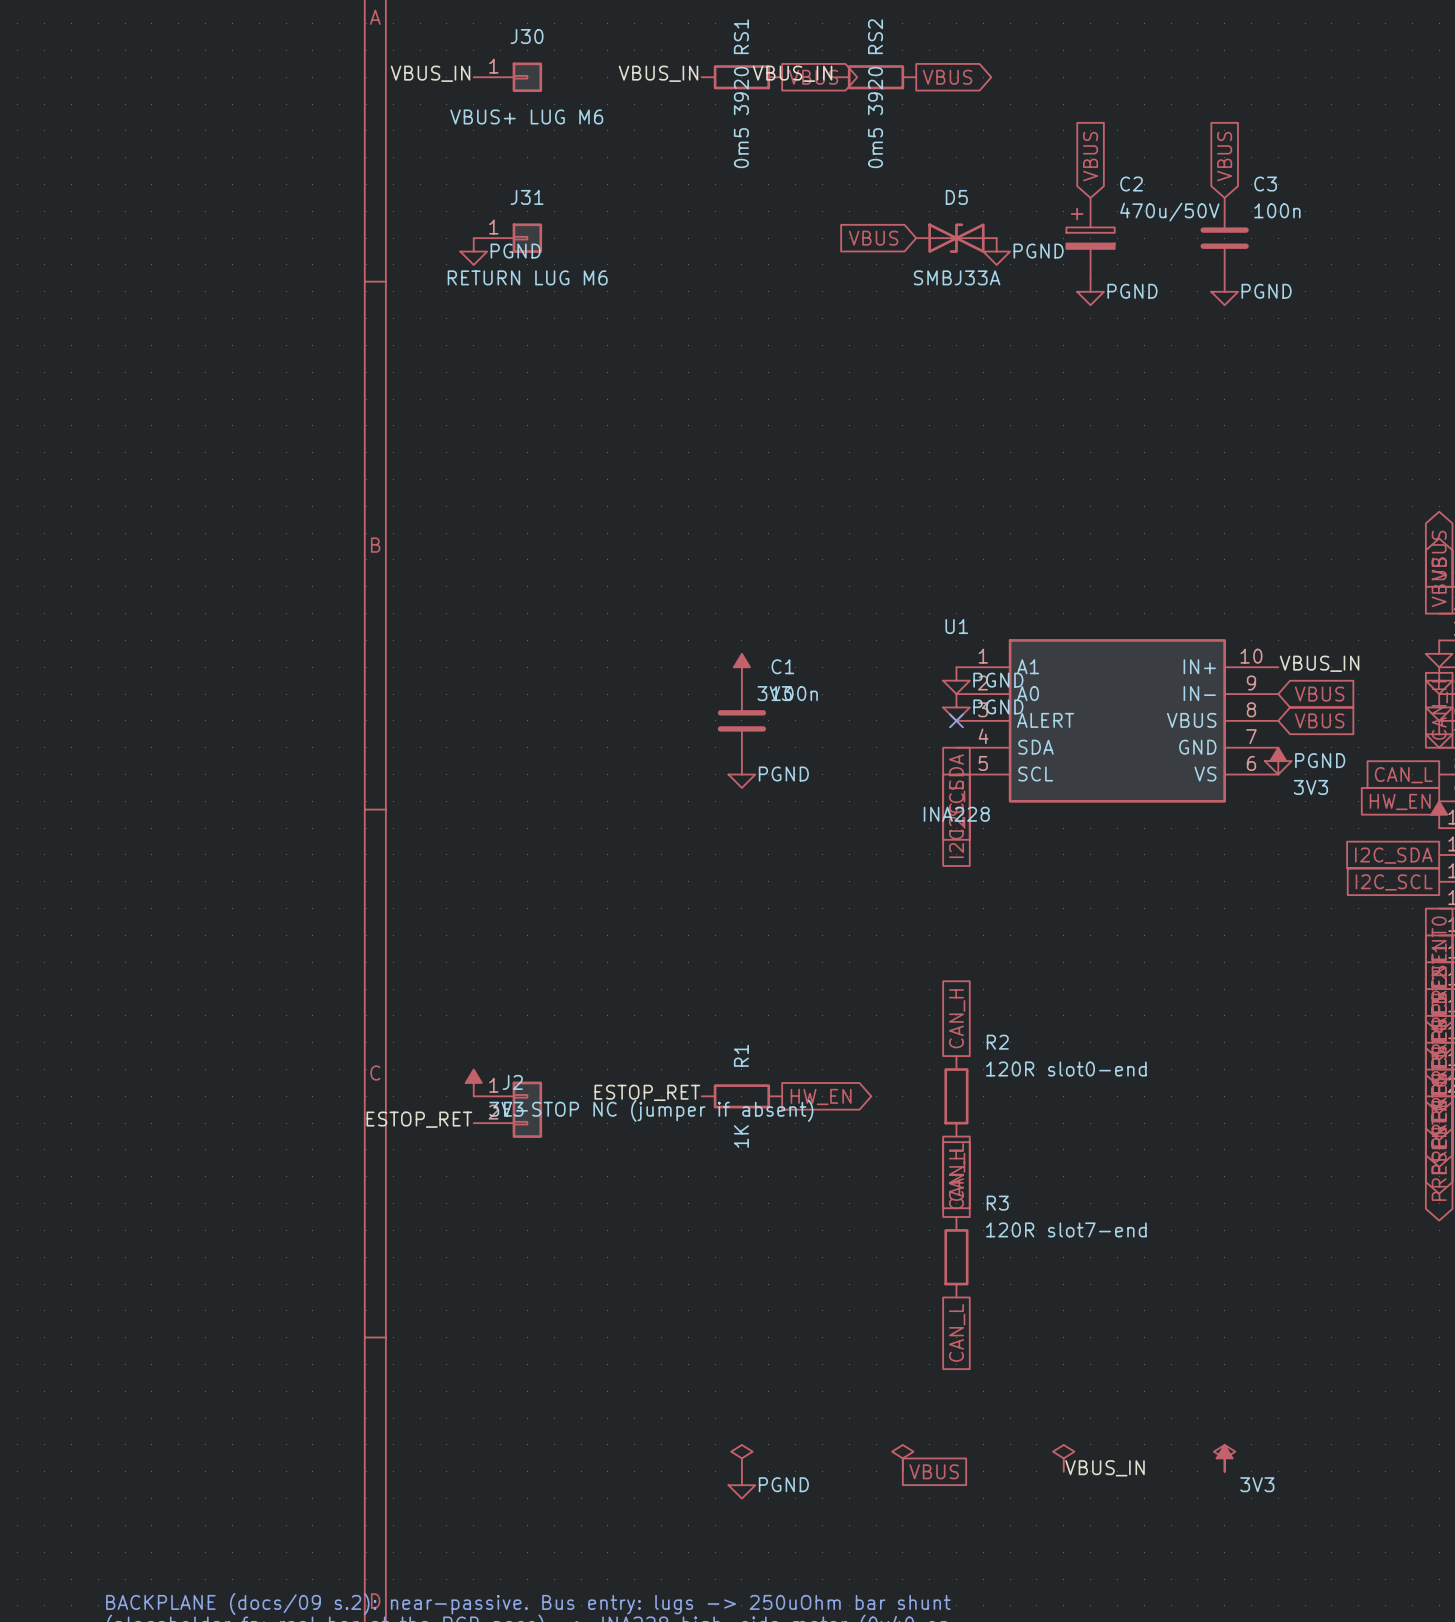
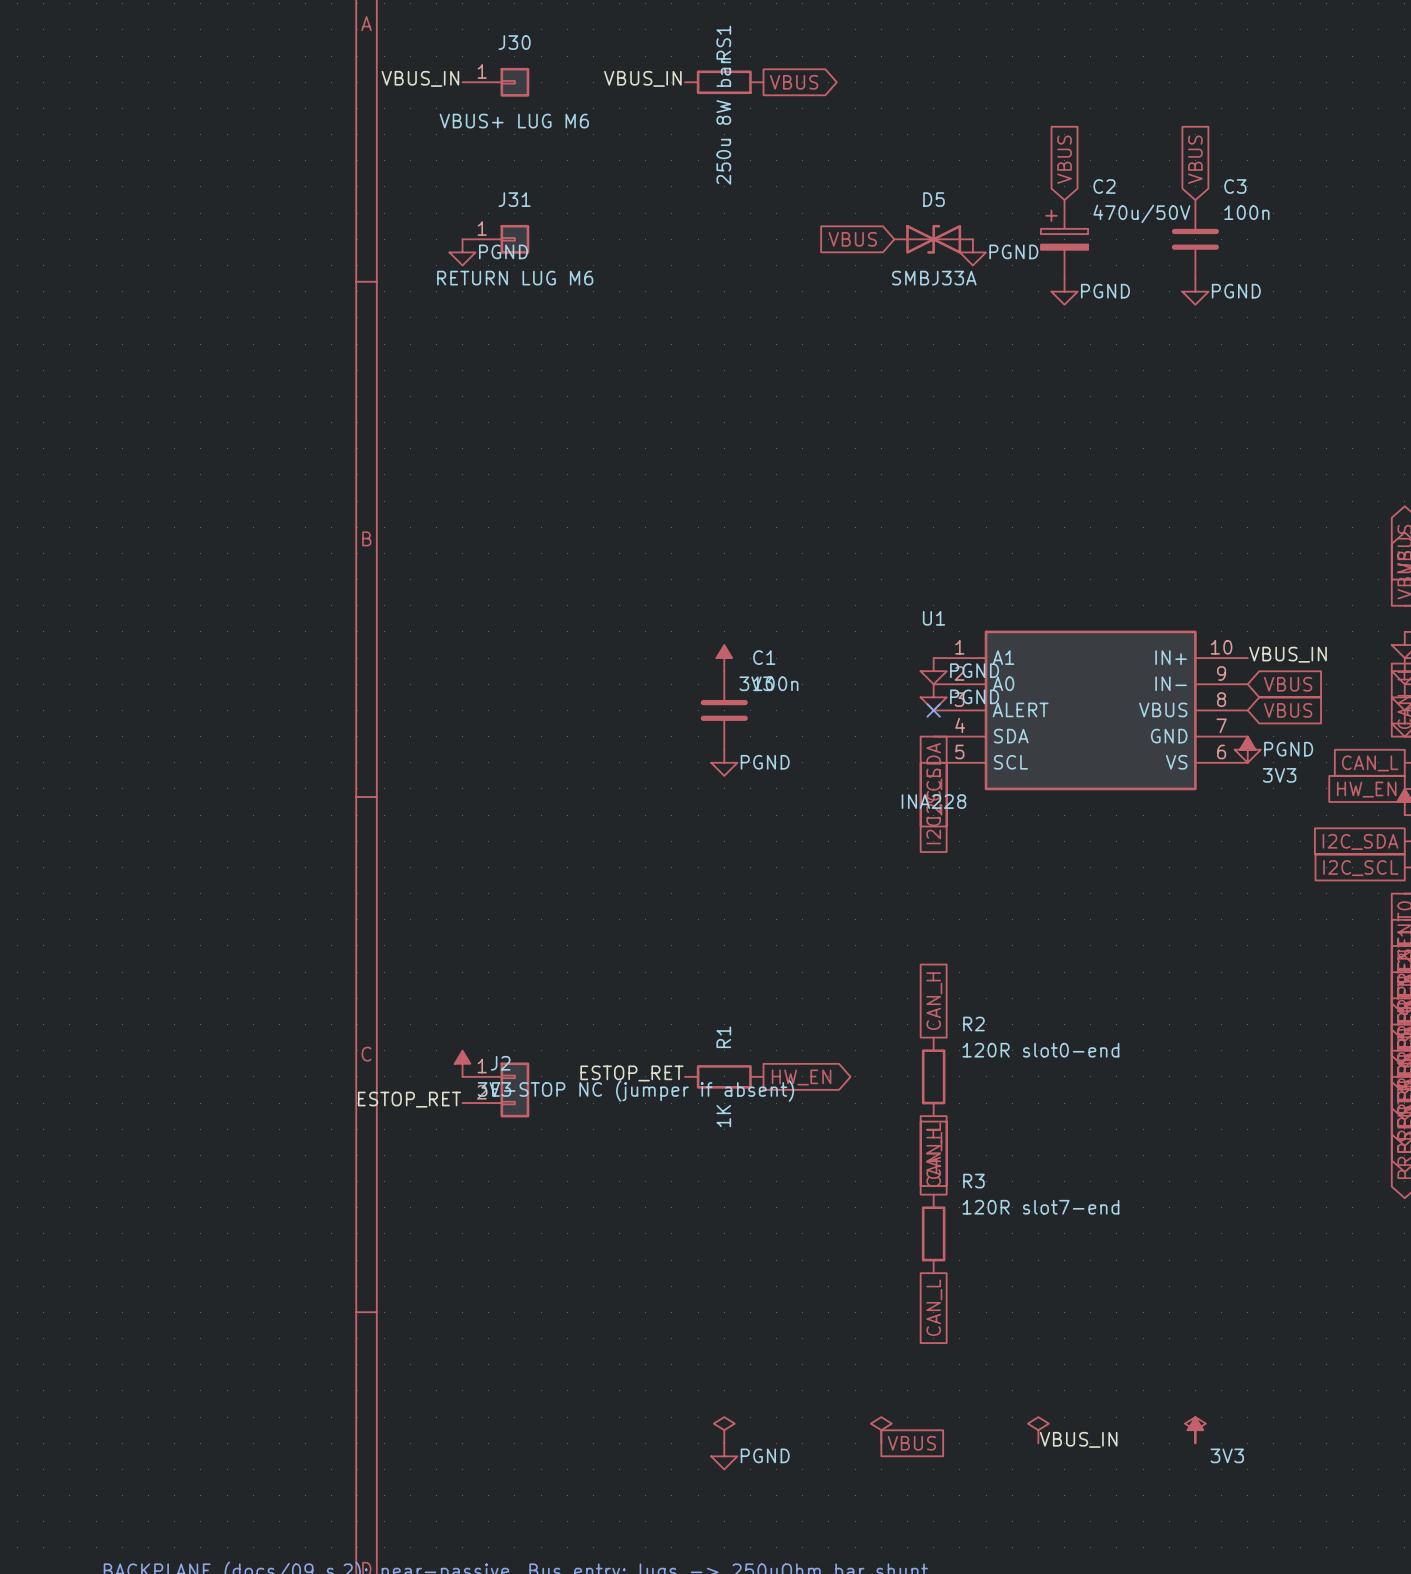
label: VBUS_IN (792, 73) -> none
RS2: 0m5 3920 (876, 77) -> none
global label: VBUS (947, 77) -> none
RS1 value: 0m5 3920 (741, 117) -> 250u 8W bar (723, 121)

